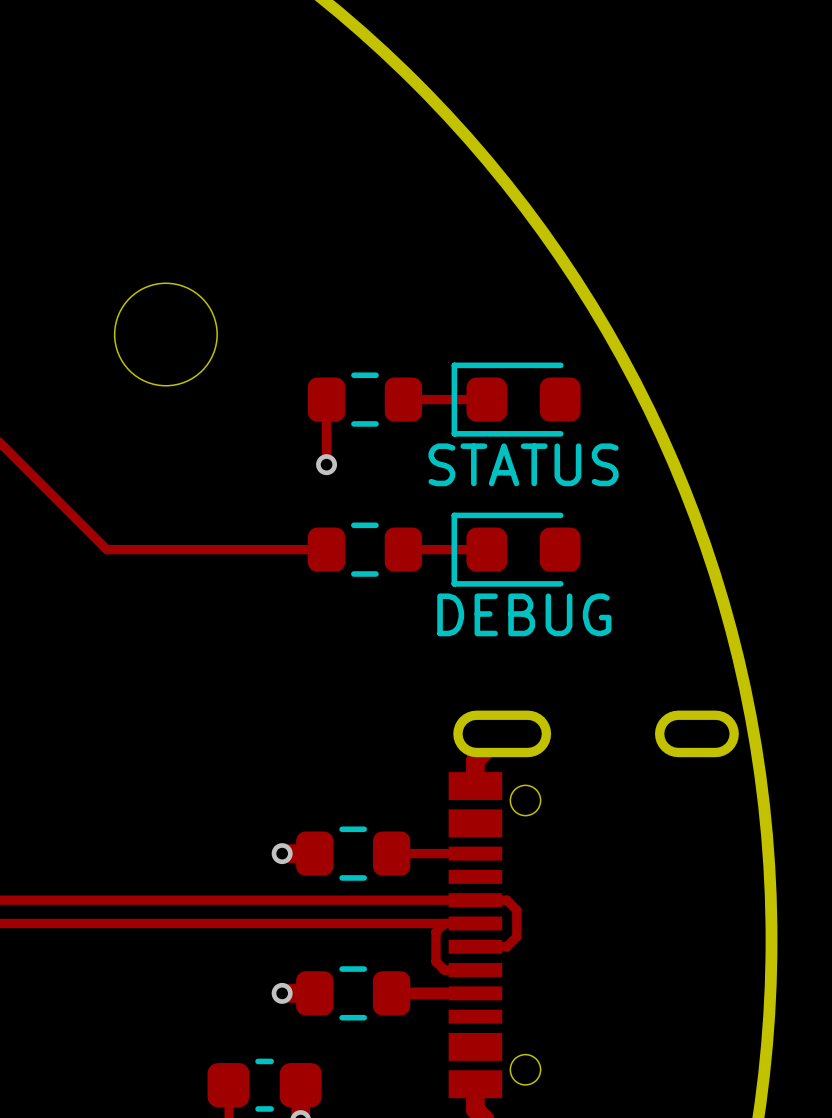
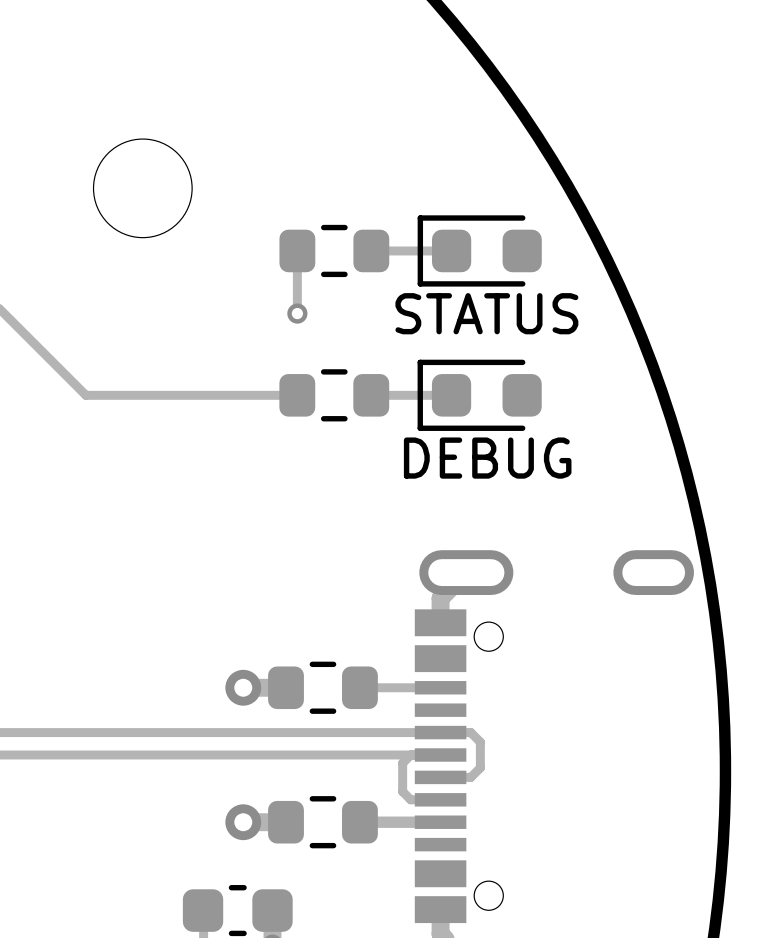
via size: [271, 843, 293, 865] -> [225, 669, 262, 706]
via size: [271, 982, 293, 1004] -> [225, 804, 262, 841]

